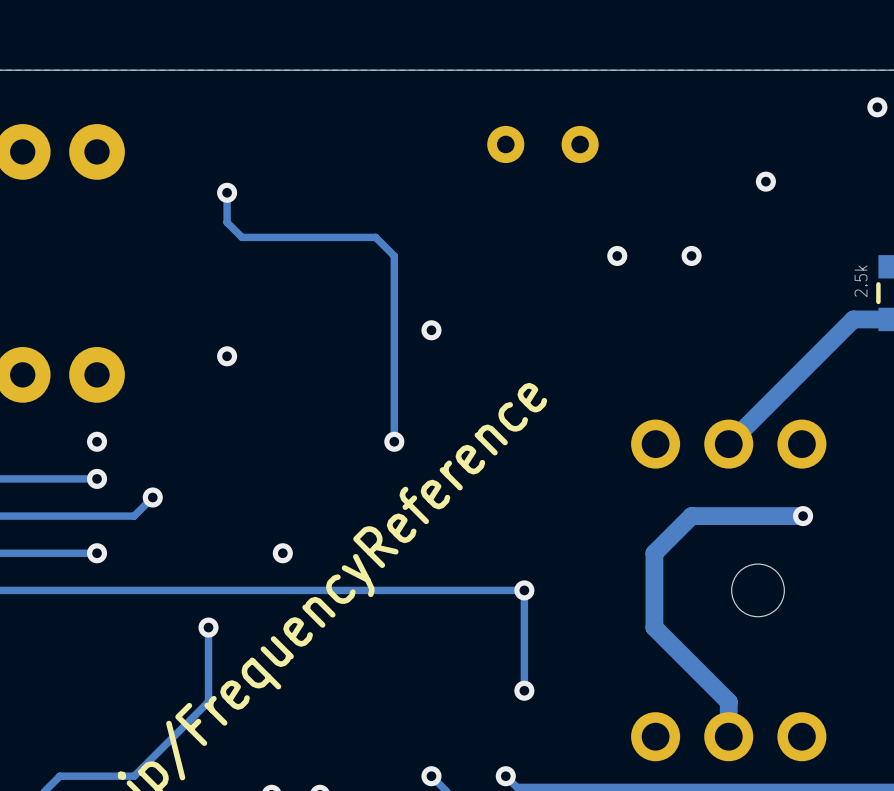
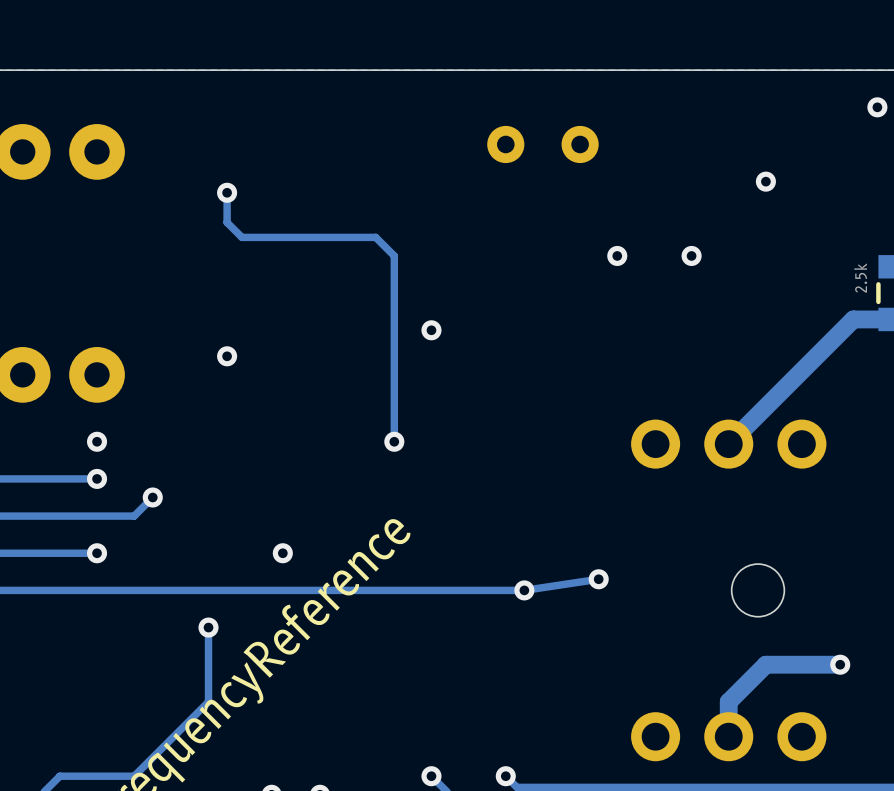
track: (803, 516) (691, 516) (654, 553) (654, 627) (728, 701) -> (840, 664) (765, 664) (728, 701)
via: (803, 516) -> none
via: none -> (598, 579)
track: (524, 590) (524, 690) -> (524, 590) (598, 579)
via: none -> (840, 664)
via: (524, 690) -> none

